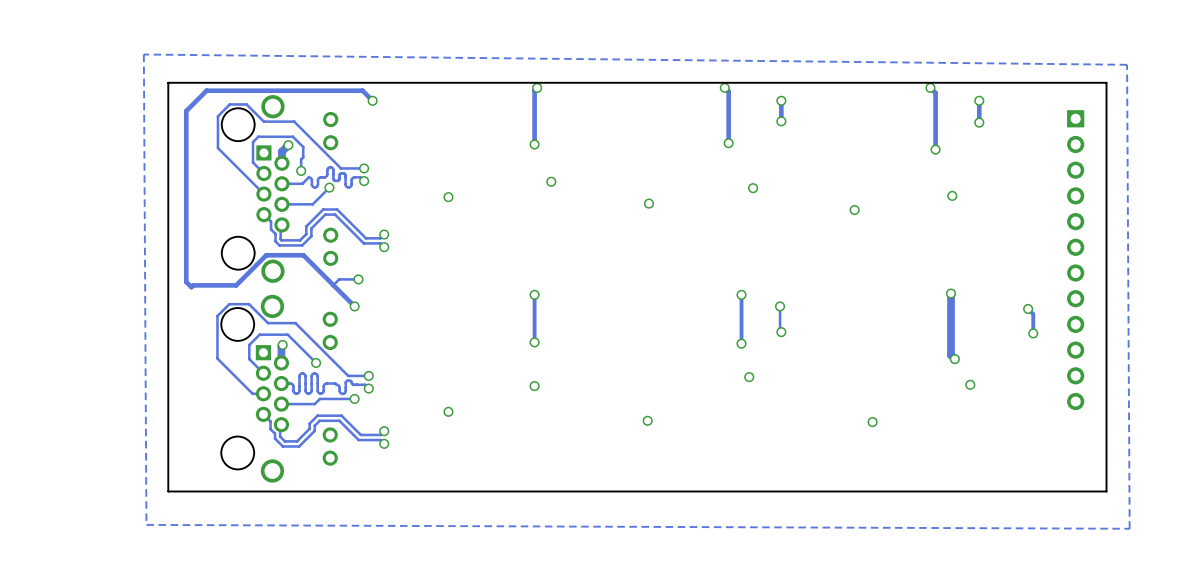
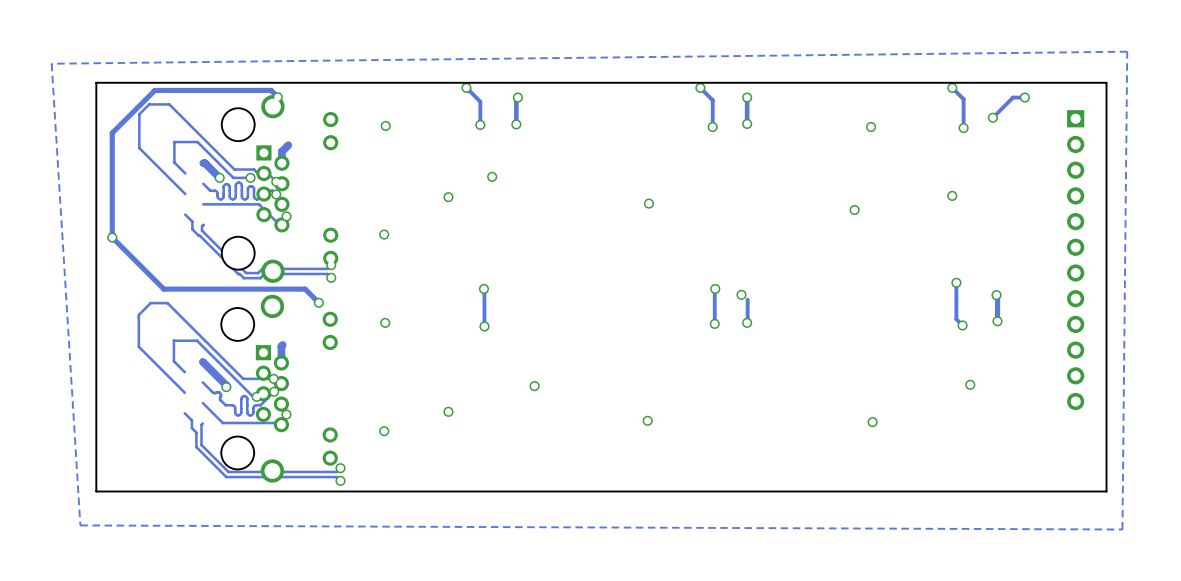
zone outline: (143, 54) (1127, 64) (1129, 528) (146, 524) (143, 54) -> (1127, 51) (1122, 529) (80, 525) (51, 63) (1127, 51)
board edge: (168, 82) (168, 491) -> (168, 82) (96, 82) (96, 491) (168, 491)
via: none -> (466, 87)
track: (537, 87) (534, 90) (534, 144) -> none
via: (537, 87) -> none
track: none -> (700, 87) (712, 100) (712, 126)
via: none -> (700, 87)
track: (724, 87) (728, 91) (728, 143) -> none
via: (724, 87) -> none
track: (930, 87) (935, 92) (935, 149) -> none
via: (930, 87) -> none
track: none -> (952, 87) (963, 99) (963, 128)
via: none -> (952, 87)
track: none -> (469, 90) (466, 87) (480, 101) (480, 124)
track: none -> (277, 97) (271, 90) (154, 90) (112, 133) (112, 237) (163, 289) (305, 289) (318, 302)
via: none -> (277, 97)
track: none -> (517, 97) (516, 124)
via: none -> (517, 97)
track: none -> (747, 97) (747, 123)
via: none -> (747, 97)
track: none -> (1024, 97) (1013, 97) (992, 117)
via: none -> (1024, 97)
track: (372, 100) (362, 90) (206, 90) (186, 111) (186, 282) (191, 287) (193, 285) (236, 285) (266, 255) (303, 255) (354, 306) -> none
via: (372, 100) -> none
track: (781, 100) (781, 121) -> none
via: (781, 100) -> none
track: (979, 100) (979, 122) -> none
via: (979, 100) -> none
via: none -> (992, 117)
via: (781, 121) -> none
via: (979, 122) -> none
via: none -> (747, 123)
via: none -> (480, 124)
via: none -> (516, 124)
via: none -> (385, 125)
via: none -> (712, 126)
via: none -> (871, 126)
via: none -> (963, 128)
via: (728, 143) -> none
via: (534, 144) -> none
via: (288, 145) -> none
via: (935, 149) -> none
track: none -> (203, 163) (219, 177)
track: (364, 168) (341, 168) (294, 121) (263, 121) (246, 104) (229, 104) (217, 116) (217, 148) (263, 194) -> none
via: (364, 168) -> none
track: (301, 170) (303, 147) (292, 136) (258, 136) (253, 142) (253, 162) (263, 173) -> none
via: (301, 170) -> none
track: none -> (185, 173) (174, 162) (174, 142) (197, 142) (233, 177) (250, 177)
via: none -> (492, 176)
via: none -> (219, 177)
via: none -> (250, 177)
track: (324, 177) (327, 175) (327, 168) (330, 167) (333, 169) (334, 180) (339, 180) (340, 173) (345, 174) (347, 187) (351, 185) (353, 177) (360, 177) (364, 181) -> none
track: (324, 177) (318, 178) (317, 185) (315, 187) (312, 185) (311, 179) (309, 177) (302, 183) (281, 183) -> none
track: none -> (276, 181) (266, 172) (256, 172) (254, 169) (234, 169) (169, 104) (149, 104) (139, 114) (139, 148) (185, 194)
via: none -> (276, 181)
via: (364, 181) -> none
via: (551, 181) -> none
track: none -> (203, 183) (210, 190) (216, 191) (220, 199) (223, 197) (223, 186) (226, 184) (229, 186) (230, 197) (234, 198) (235, 184) (238, 182) (241, 184) (241, 196) (244, 199) (247, 197) (249, 186) (253, 187) (254, 197) (256, 199) (259, 198) (262, 190) (272, 190) (276, 194)
track: (329, 187) (312, 204) (281, 204) -> none
via: (329, 187) -> none
via: (753, 188) -> none
via: none -> (276, 194)
track: none -> (203, 204) (259, 204) (276, 221) (281, 221) (286, 216)
track: none -> (185, 214) (192, 221) (192, 229) (243, 278) (260, 278) (264, 274) (327, 274) (331, 277)
track: (263, 214) (271, 221) (271, 229) (275, 233) (275, 241) (279, 245) (302, 245) (311, 236) (311, 228) (325, 214) (335, 214) (363, 243) (380, 243) (384, 247) -> none
via: none -> (286, 216)
track: (281, 224) (281, 240) (300, 240) (306, 234) (306, 226) (323, 209) (337, 209) (365, 238) (380, 238) (384, 234) -> none
track: none -> (203, 225) (202, 230) (246, 273) (258, 273) (262, 268) (327, 268) (331, 265)
via: none -> (112, 237)
via: (384, 247) -> none
via: none -> (331, 265)
via: none -> (331, 277)
track: (358, 279) (339, 279) (333, 285) -> none
via: (358, 279) -> none
track: none -> (956, 282) (956, 319) (962, 325)
track: none -> (483, 288) (484, 326)
via: none -> (483, 288)
track: none -> (715, 288) (714, 323)
via: none -> (715, 288)
track: (951, 293) (951, 355) (954, 359) -> none
via position: (951, 293) -> (956, 282)
track: (534, 294) (534, 342) -> none
via: (534, 294) -> none
track: (741, 294) (741, 343) -> none
track: none -> (996, 295) (997, 321)
via: none -> (996, 295)
track: none -> (747, 299) (747, 322)
via: none -> (318, 302)
via: (354, 306) -> none
track: (780, 306) (781, 332) -> none
via: (780, 306) -> none
track: (1028, 308) (1033, 314) (1033, 333) -> none
via: (1028, 308) -> none
via: none -> (997, 321)
via: none -> (385, 322)
via: none -> (747, 322)
via: none -> (714, 323)
via: none -> (962, 325)
via: none -> (484, 326)
via: (781, 332) -> none
via: (1033, 333) -> none
via: (534, 342) -> none
via: (741, 343) -> none
via: (282, 344) -> none
via: (954, 359) -> none
track: none -> (202, 361) (226, 387)
track: (316, 362) (287, 334) (259, 334) (249, 345) (249, 359) (263, 373) -> none
via: (316, 362) -> none
track: none -> (184, 372) (173, 361) (173, 340) (197, 340) (253, 396) (256, 396)
track: (368, 375) (348, 375) (295, 323) (267, 323) (249, 304) (229, 304) (217, 316) (217, 358) (252, 393) (263, 393) -> none
via: (368, 375) -> none
via: (749, 377) -> none
track: none -> (273, 378) (243, 378) (167, 303) (150, 303) (138, 314) (138, 346) (184, 392)
via: none -> (273, 378)
track: none -> (202, 382) (213, 393) (220, 393) (220, 399) (225, 405) (234, 406) (235, 413) (237, 415) (241, 413) (242, 396) (247, 397) (247, 413) (250, 415) (253, 413) (254, 406) (260, 405) (274, 391)
track: (282, 384) (291, 383) (293, 392) (297, 393) (299, 375) (303, 373) (305, 376) (305, 391) (309, 393) (311, 391) (311, 375) (314, 373) (317, 375) (317, 391) (319, 393) (323, 392) (325, 383) (335, 383) (339, 386) (340, 392) (343, 393) (347, 380) (351, 381) (353, 384) (365, 384) (368, 388) -> none
via: none -> (226, 387)
via: (368, 388) -> none
via: none -> (274, 391)
via: none -> (256, 396)
track: (354, 398) (319, 398) (314, 404) (281, 404) -> none
via: (354, 398) -> none
track: none -> (202, 403) (222, 422) (278, 422) (286, 414)
track: none -> (184, 413) (191, 420) (191, 428) (196, 432) (196, 447) (226, 477) (336, 477) (340, 480)
track: (263, 414) (270, 421) (270, 429) (275, 433) (275, 438) (282, 446) (299, 446) (314, 430) (314, 425) (319, 420) (339, 420) (358, 440) (380, 440) (384, 443) -> none
via: none -> (286, 414)
track: none -> (202, 423) (201, 444) (228, 471) (336, 471) (340, 468)
track: (281, 424) (280, 436) (285, 441) (297, 441) (309, 428) (309, 423) (317, 415) (341, 415) (360, 434) (380, 434) (384, 431) -> none
via: (384, 443) -> none
via: none -> (340, 468)
via: none -> (340, 480)

